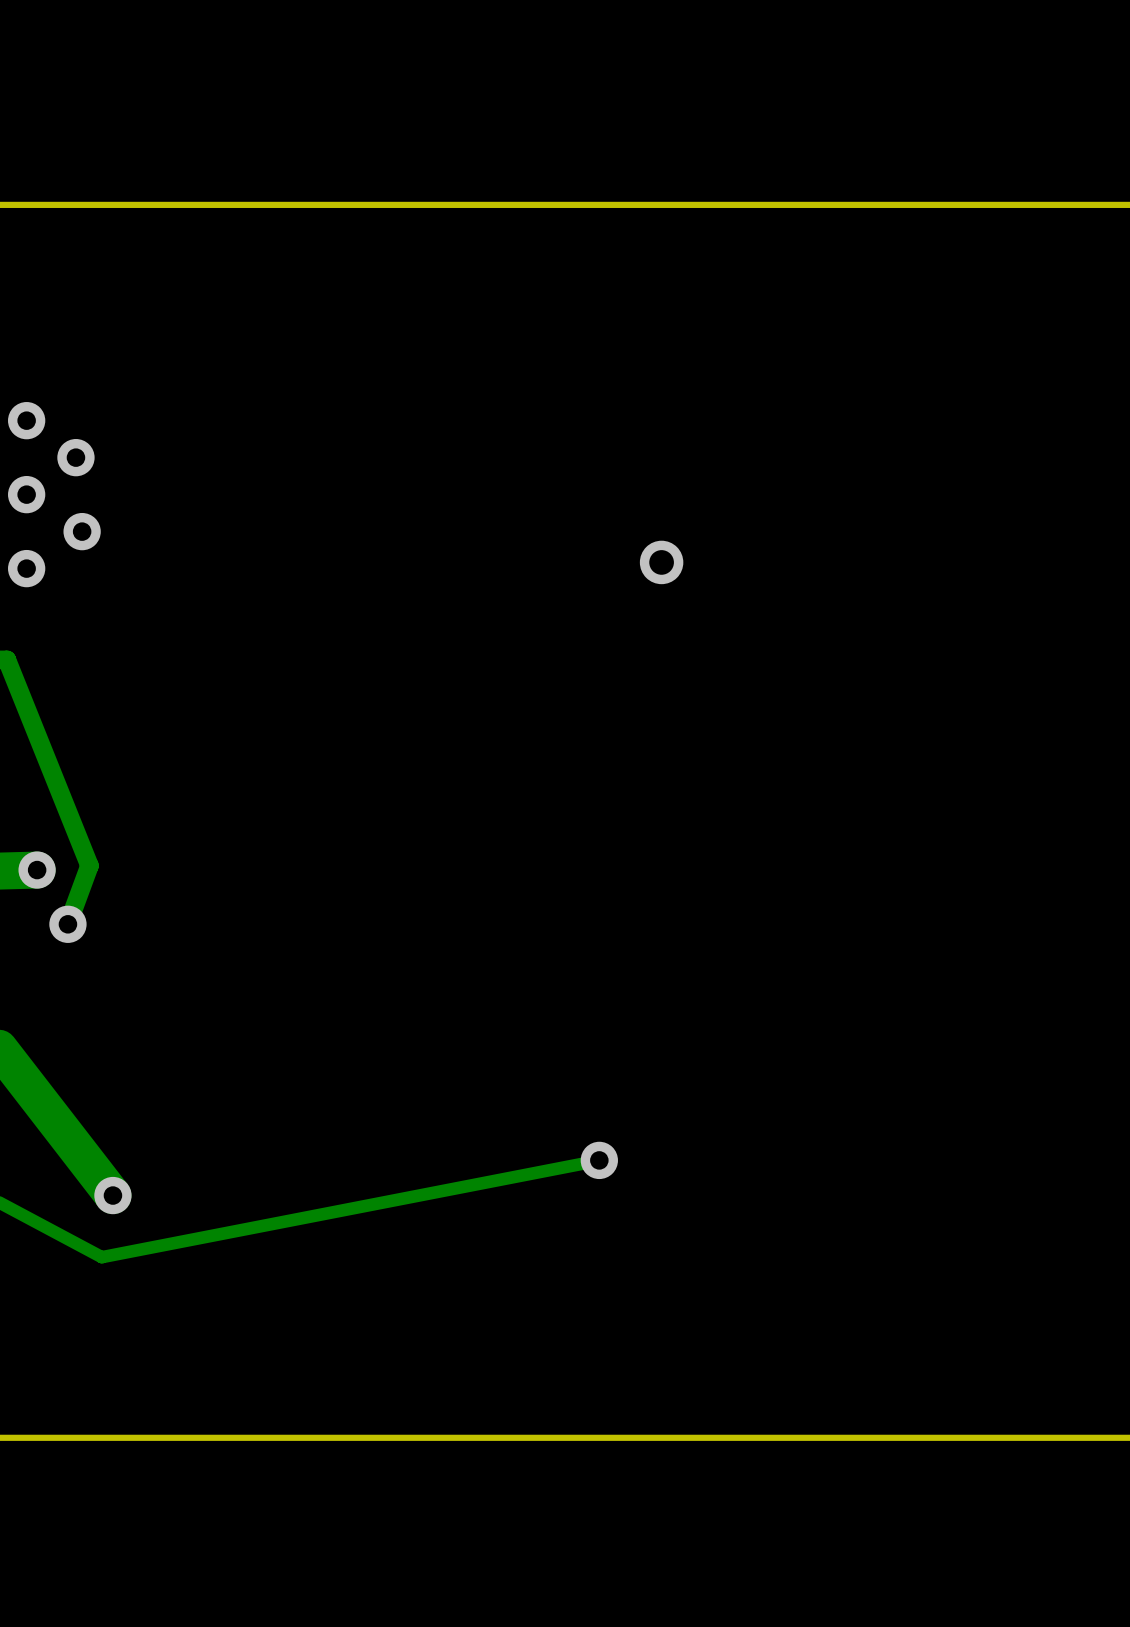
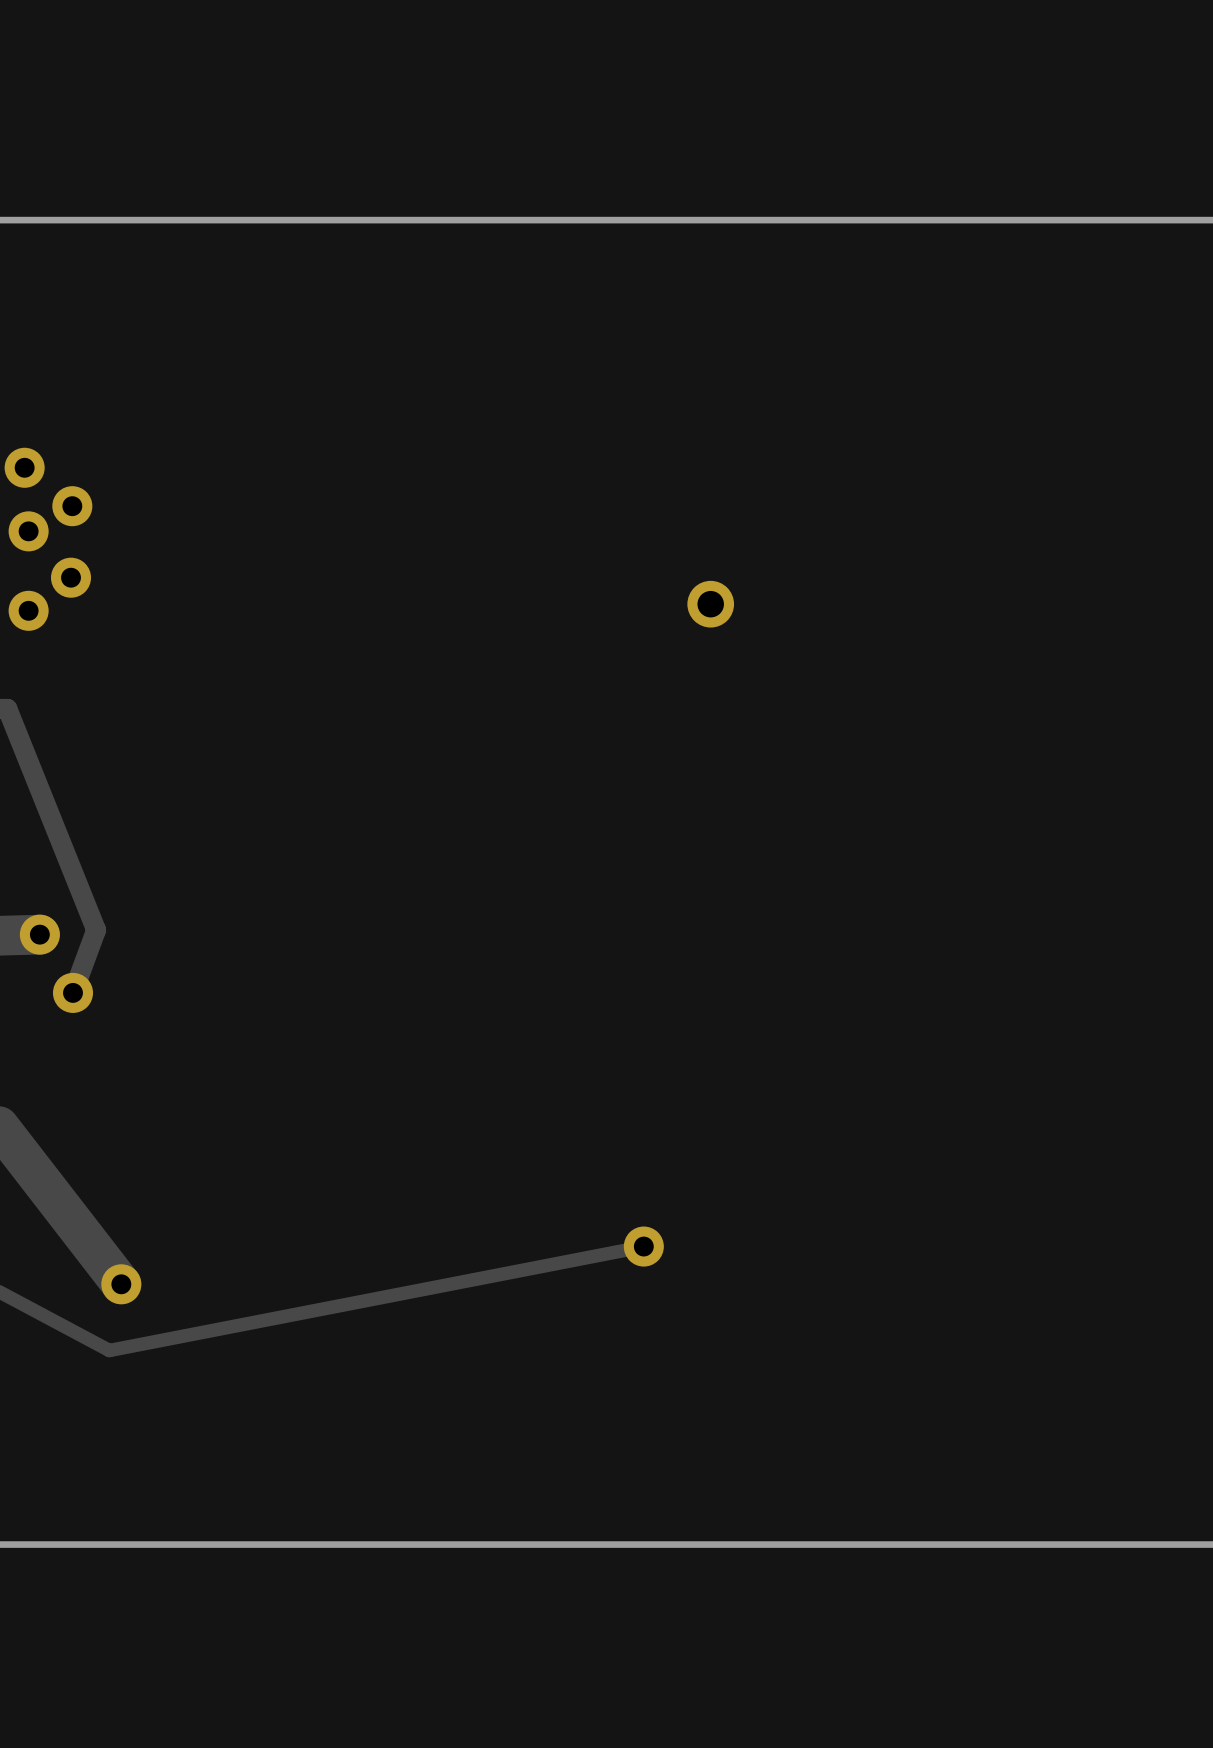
via position: (26, 420) -> (24, 467)
via position: (75, 457) -> (72, 506)
via position: (82, 531) -> (71, 577)

